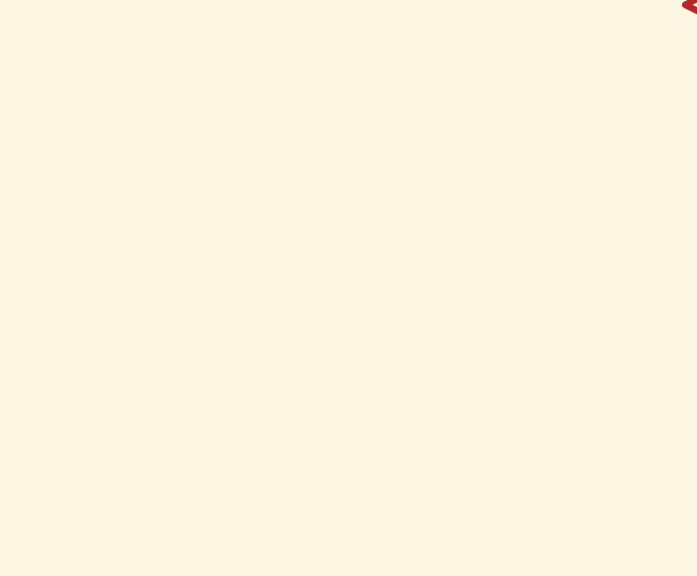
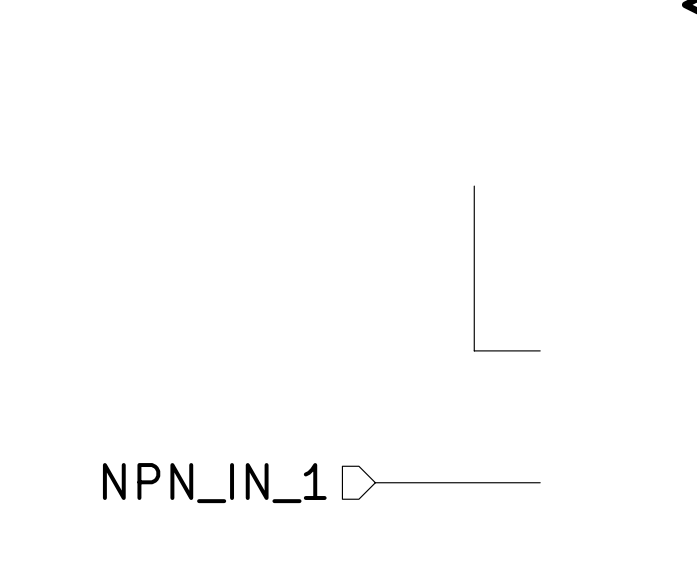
wire: none -> (474, 186) (474, 350) (540, 350)
wire: none -> (375, 482) (540, 482)
hierarchical label: none -> NPN_IN_1 (214, 483)

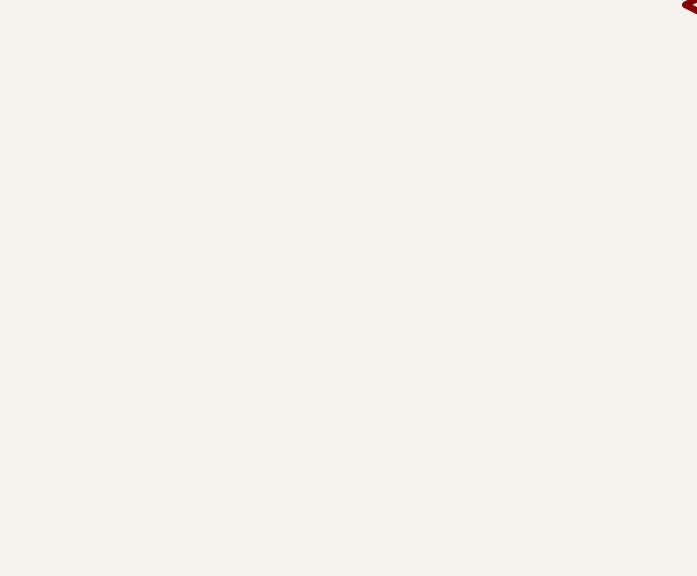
wire: (474, 186) (474, 350) (540, 350) -> none
wire: (375, 482) (540, 482) -> none
hierarchical label: NPN_IN_1 (214, 483) -> none

